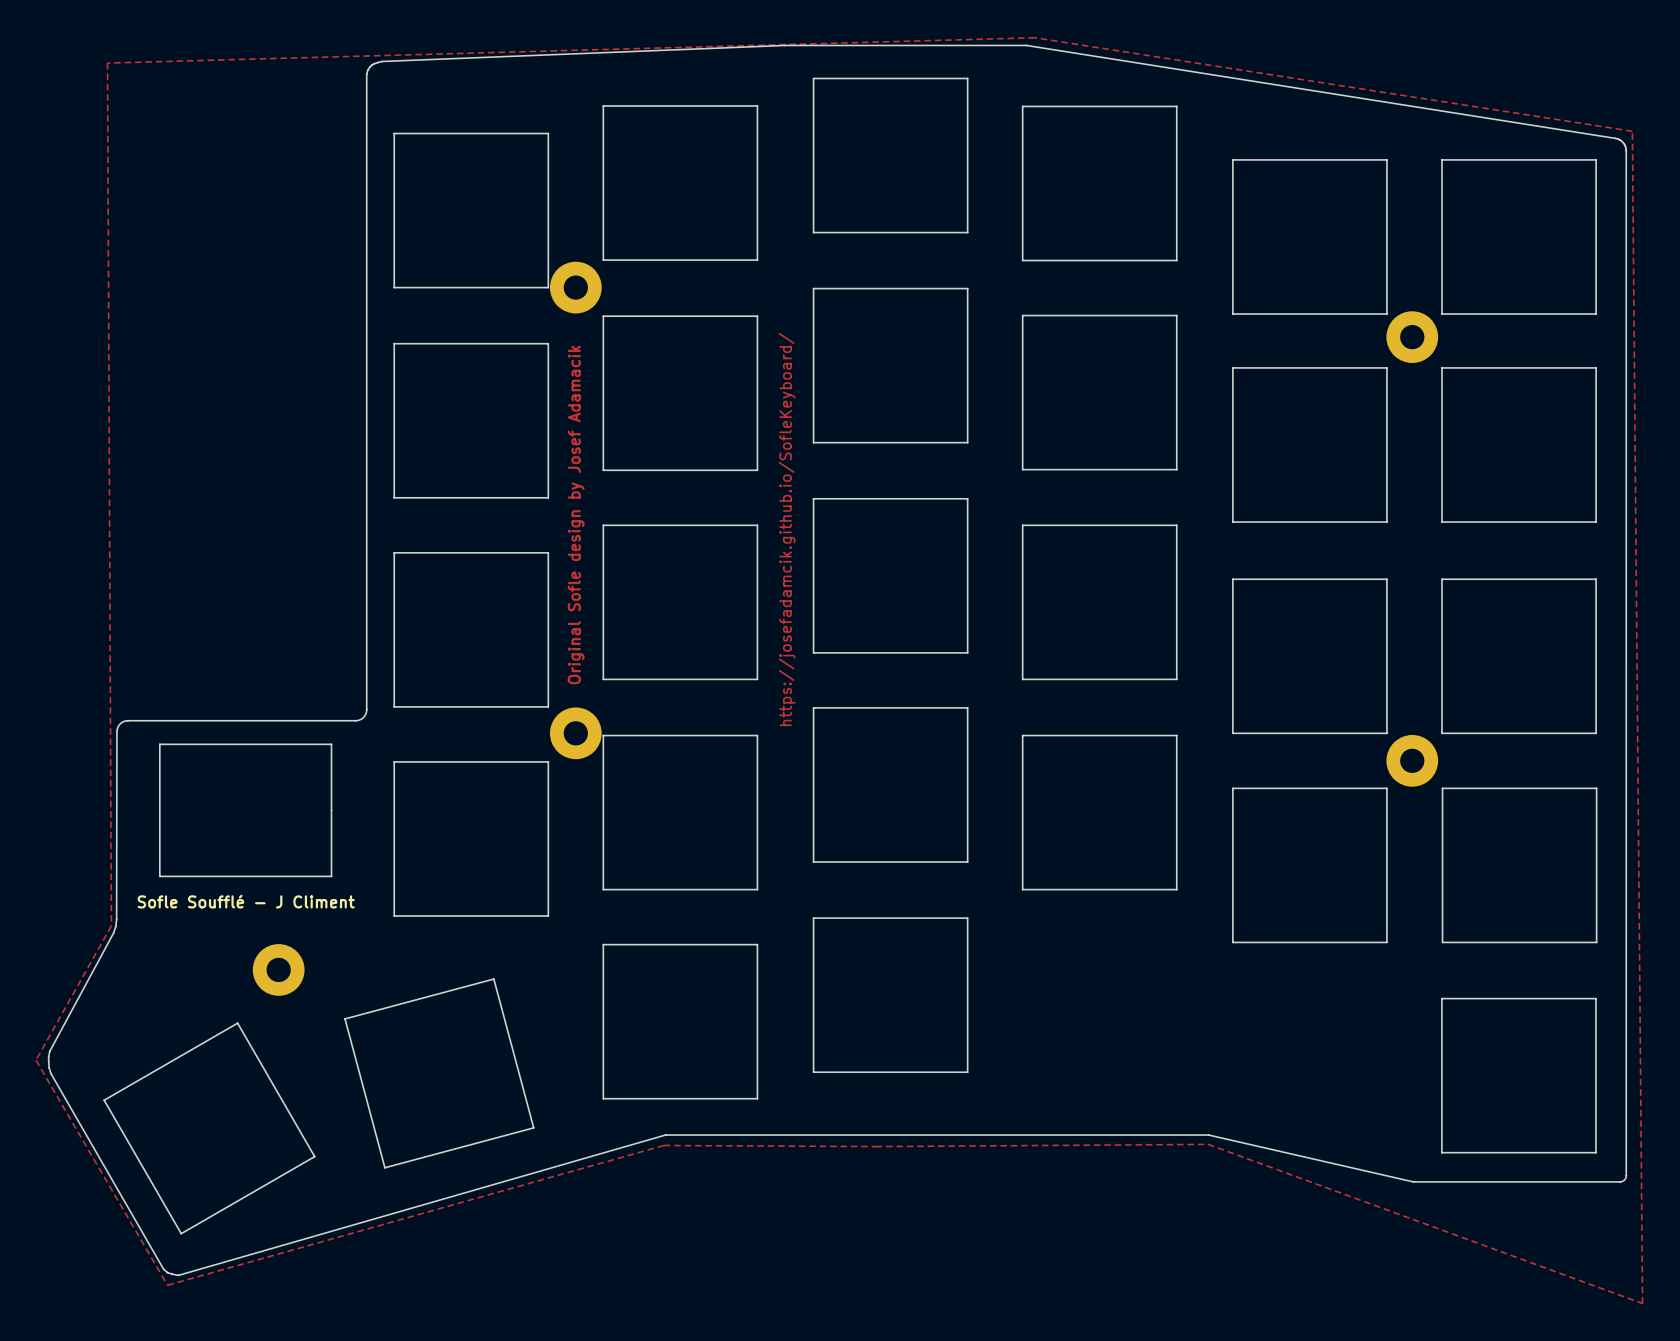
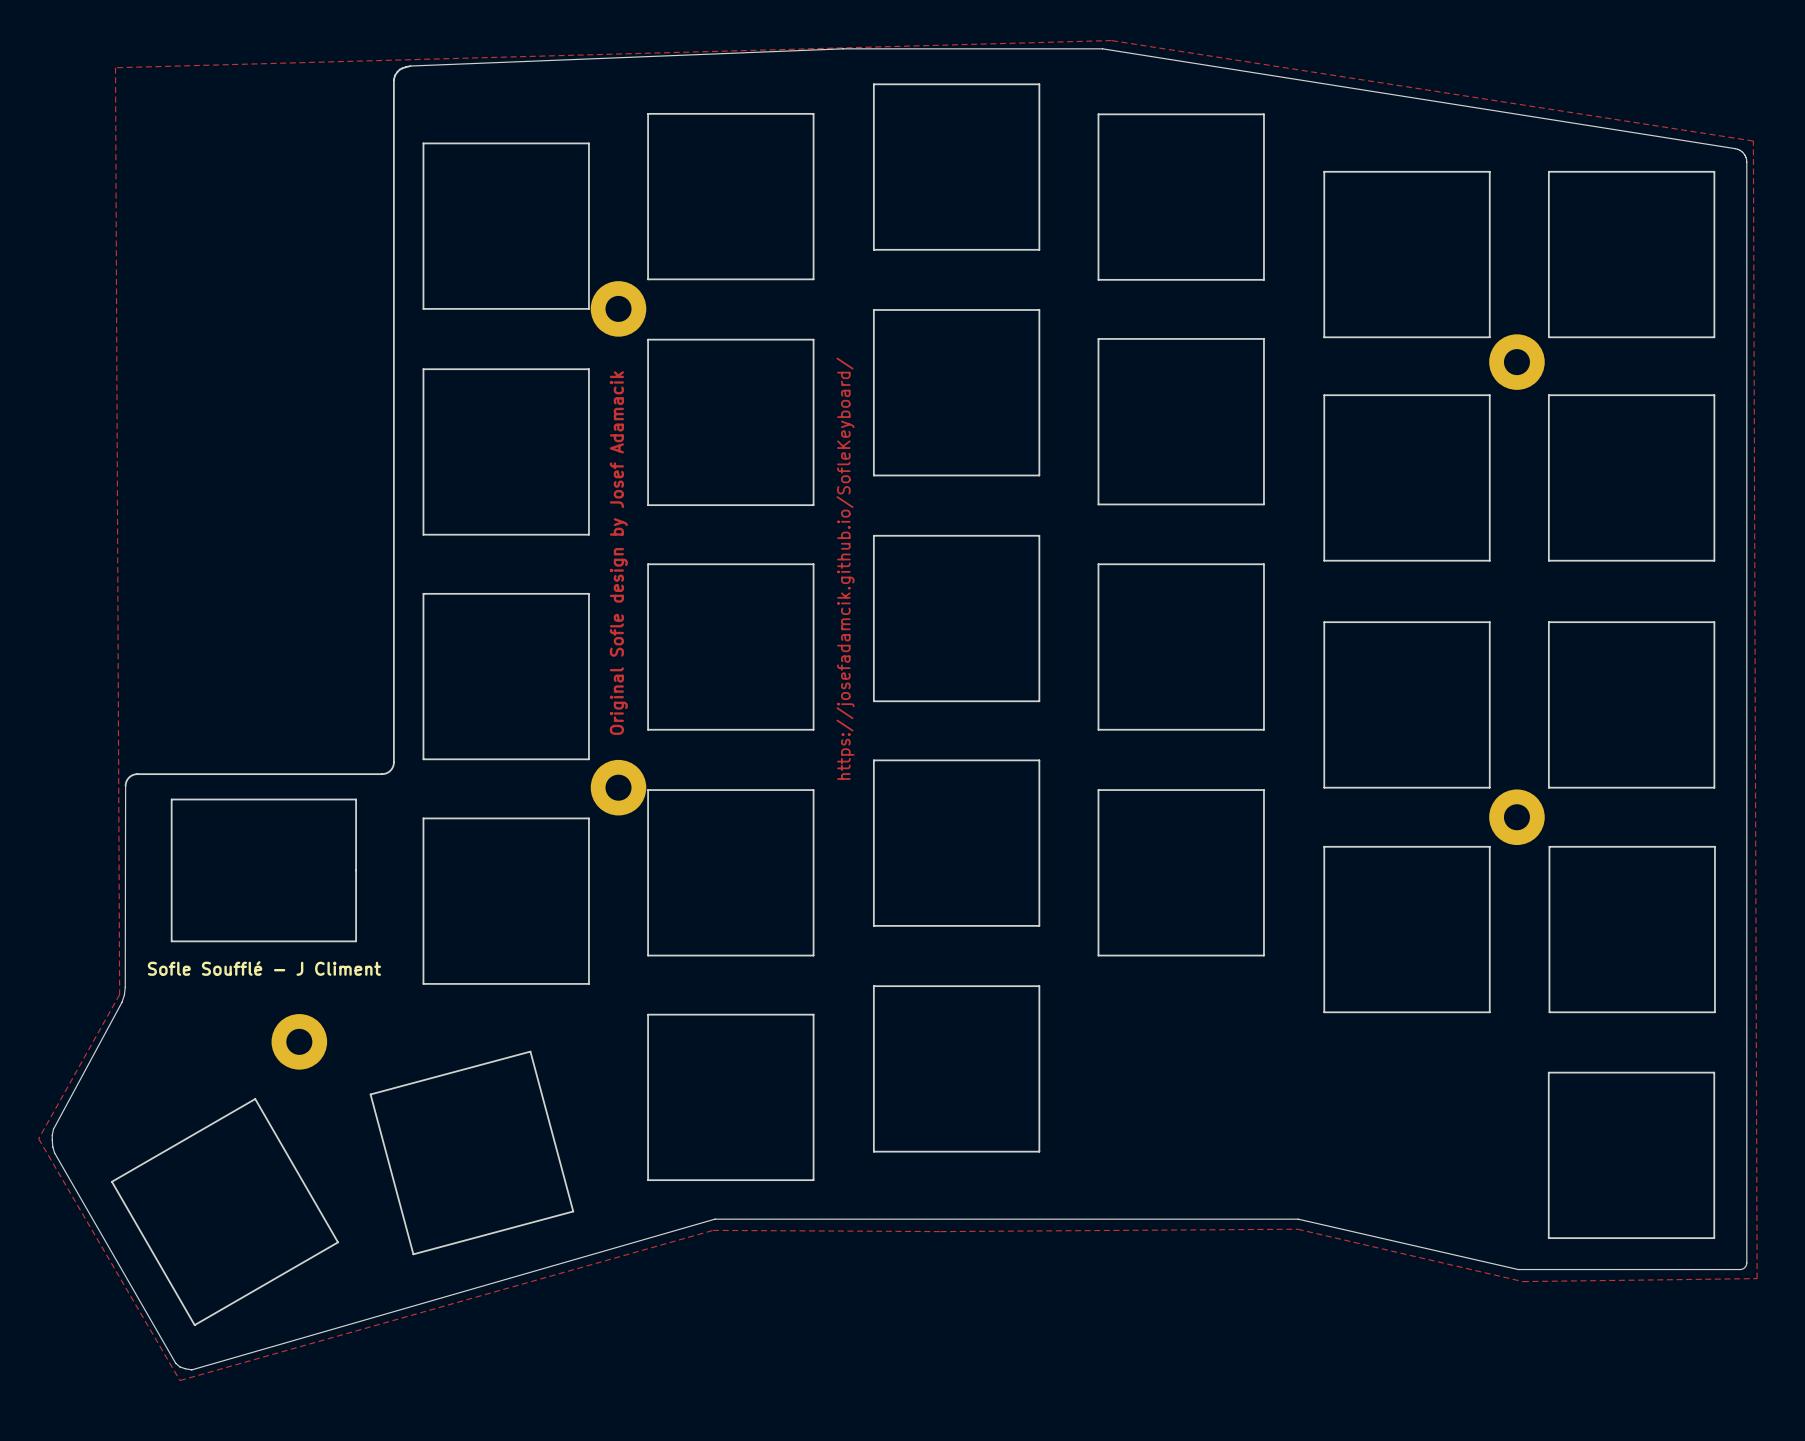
zone outline: (1632, 131) (1642, 1303) (1208, 1144) -> (1753, 141) (1757, 1278) (1522, 1281) (1297, 1229)

